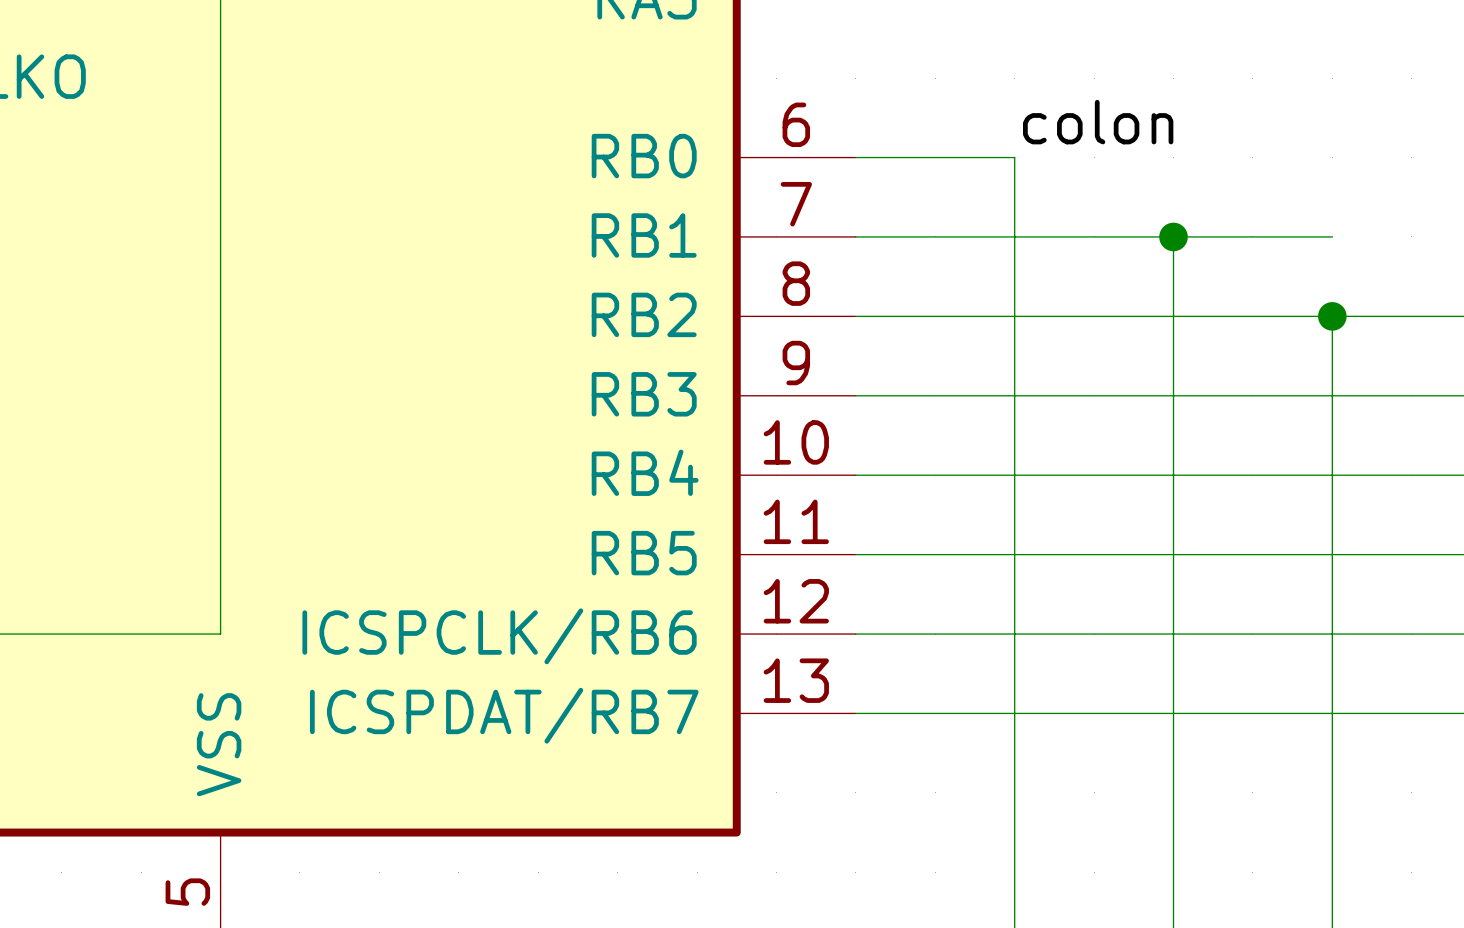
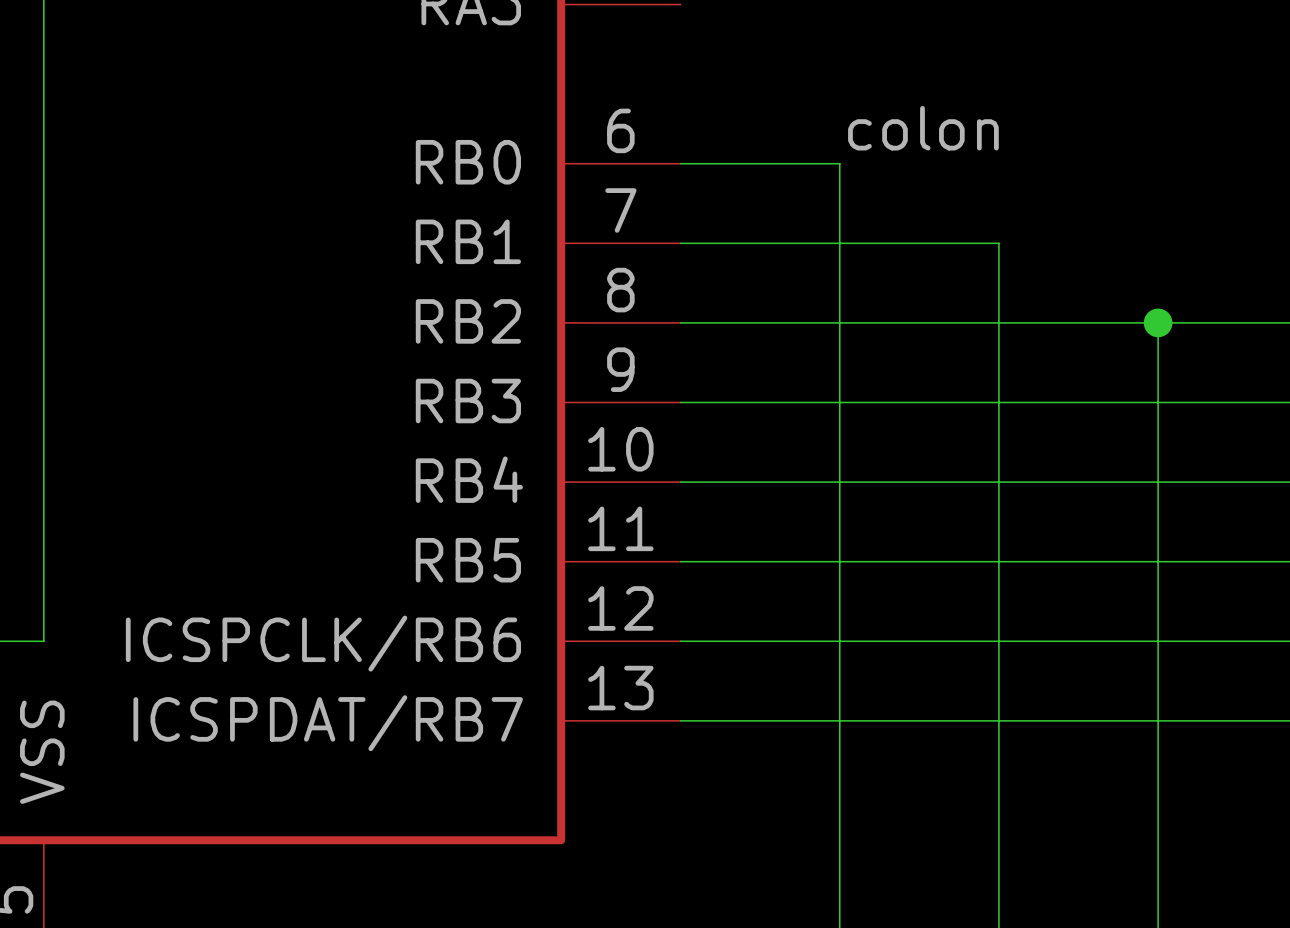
wire: (1173, 236) (1332, 236) -> none
junction: (1173, 236) -> none

